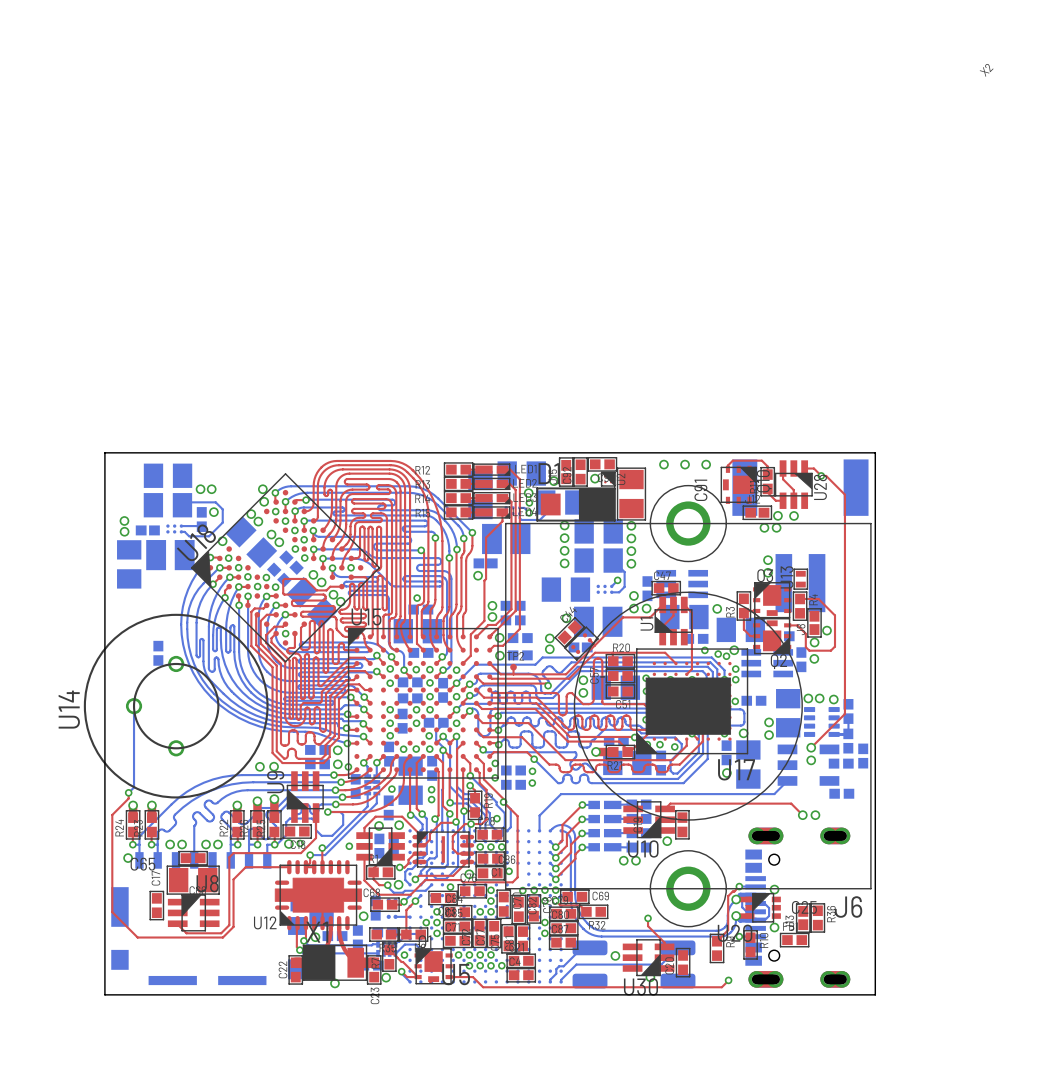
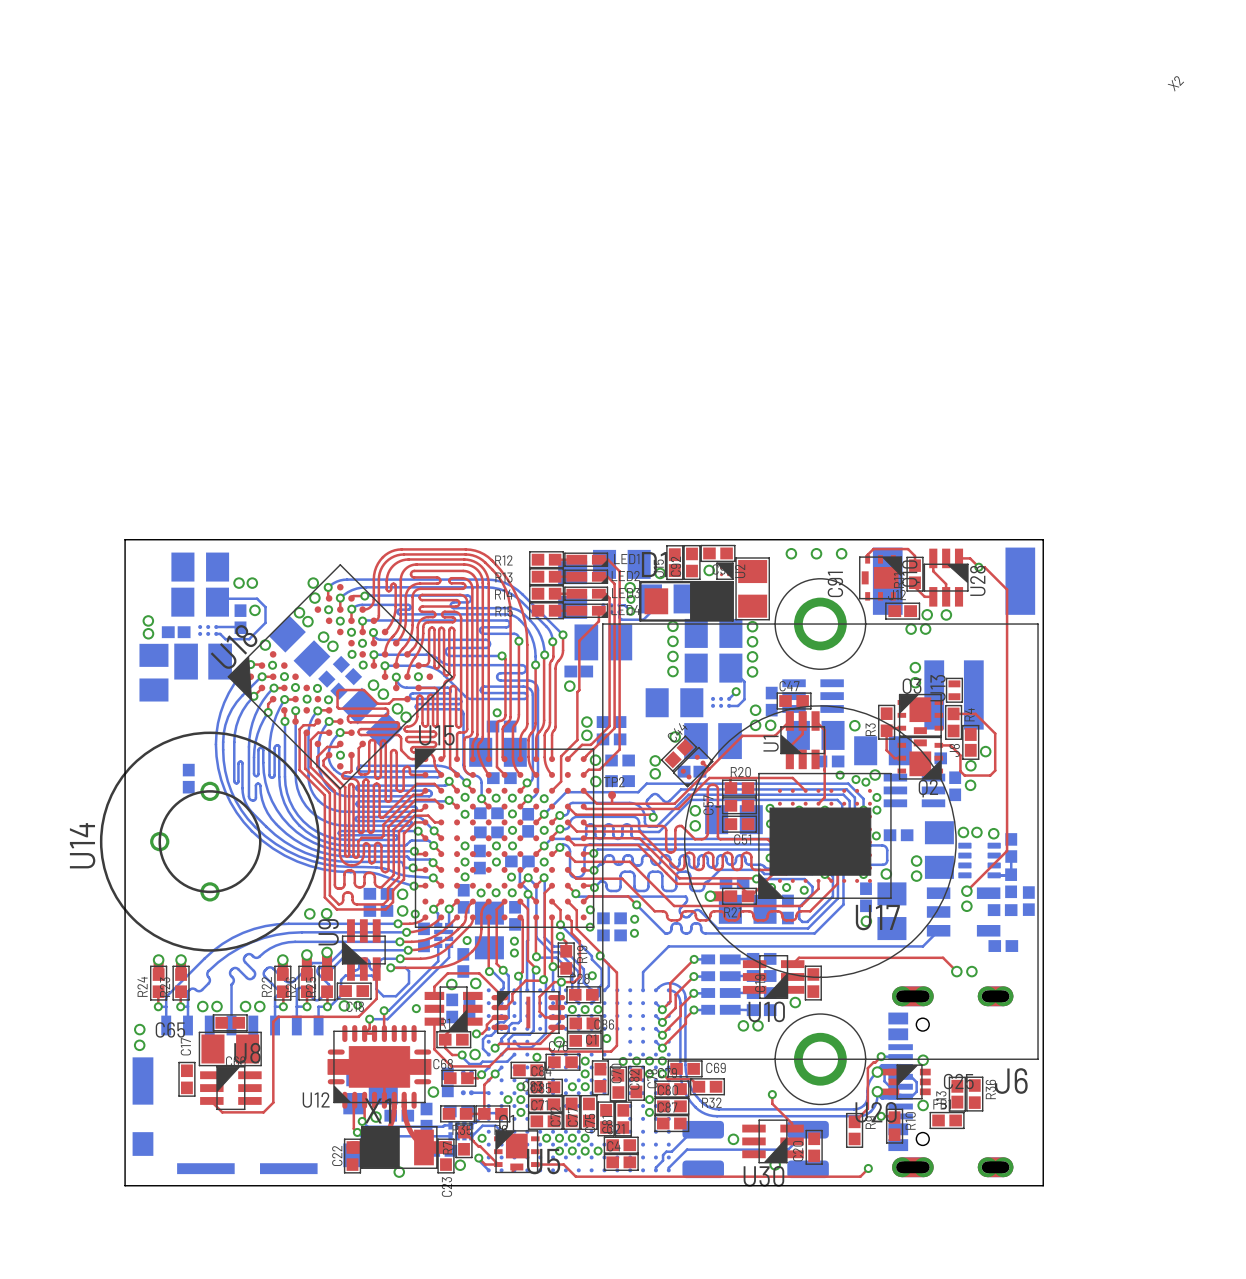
bottom track: (134, 706) (134, 787) (128, 792) -> none
top track: (128, 792) (128, 798) (112, 814) (112, 912) (137, 937) (222, 937) (233, 926) (233, 879) (245, 867) (289, 867) -> none
via: (128, 792) -> none
via: (128, 858) -> none
via: none -> (139, 1029)
via: none -> (139, 1045)

